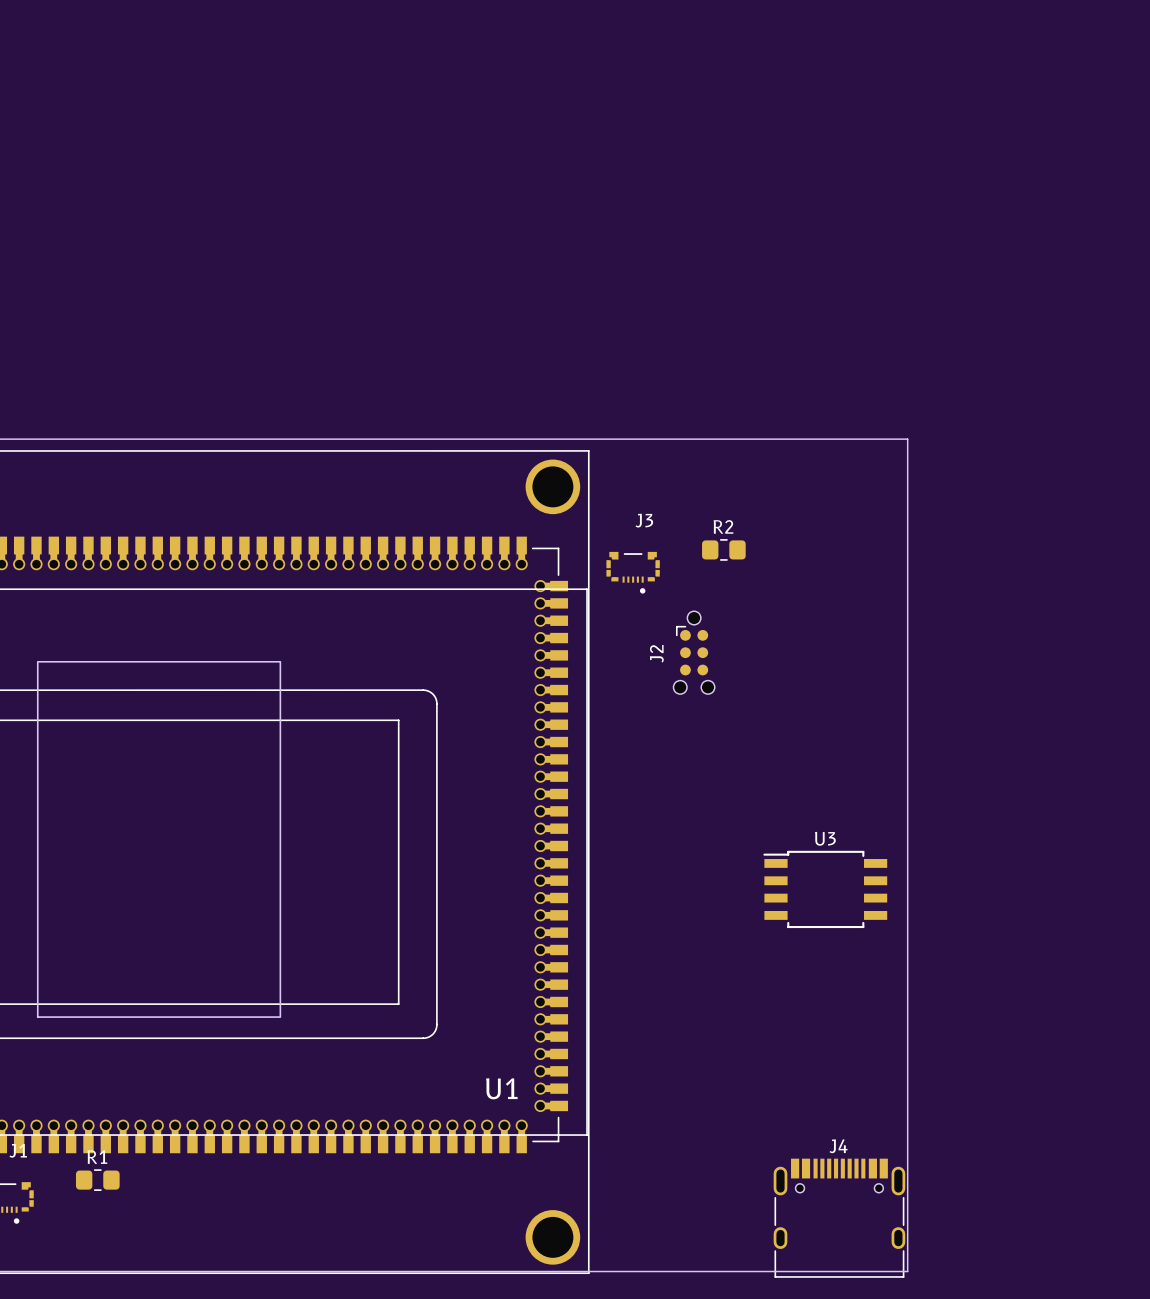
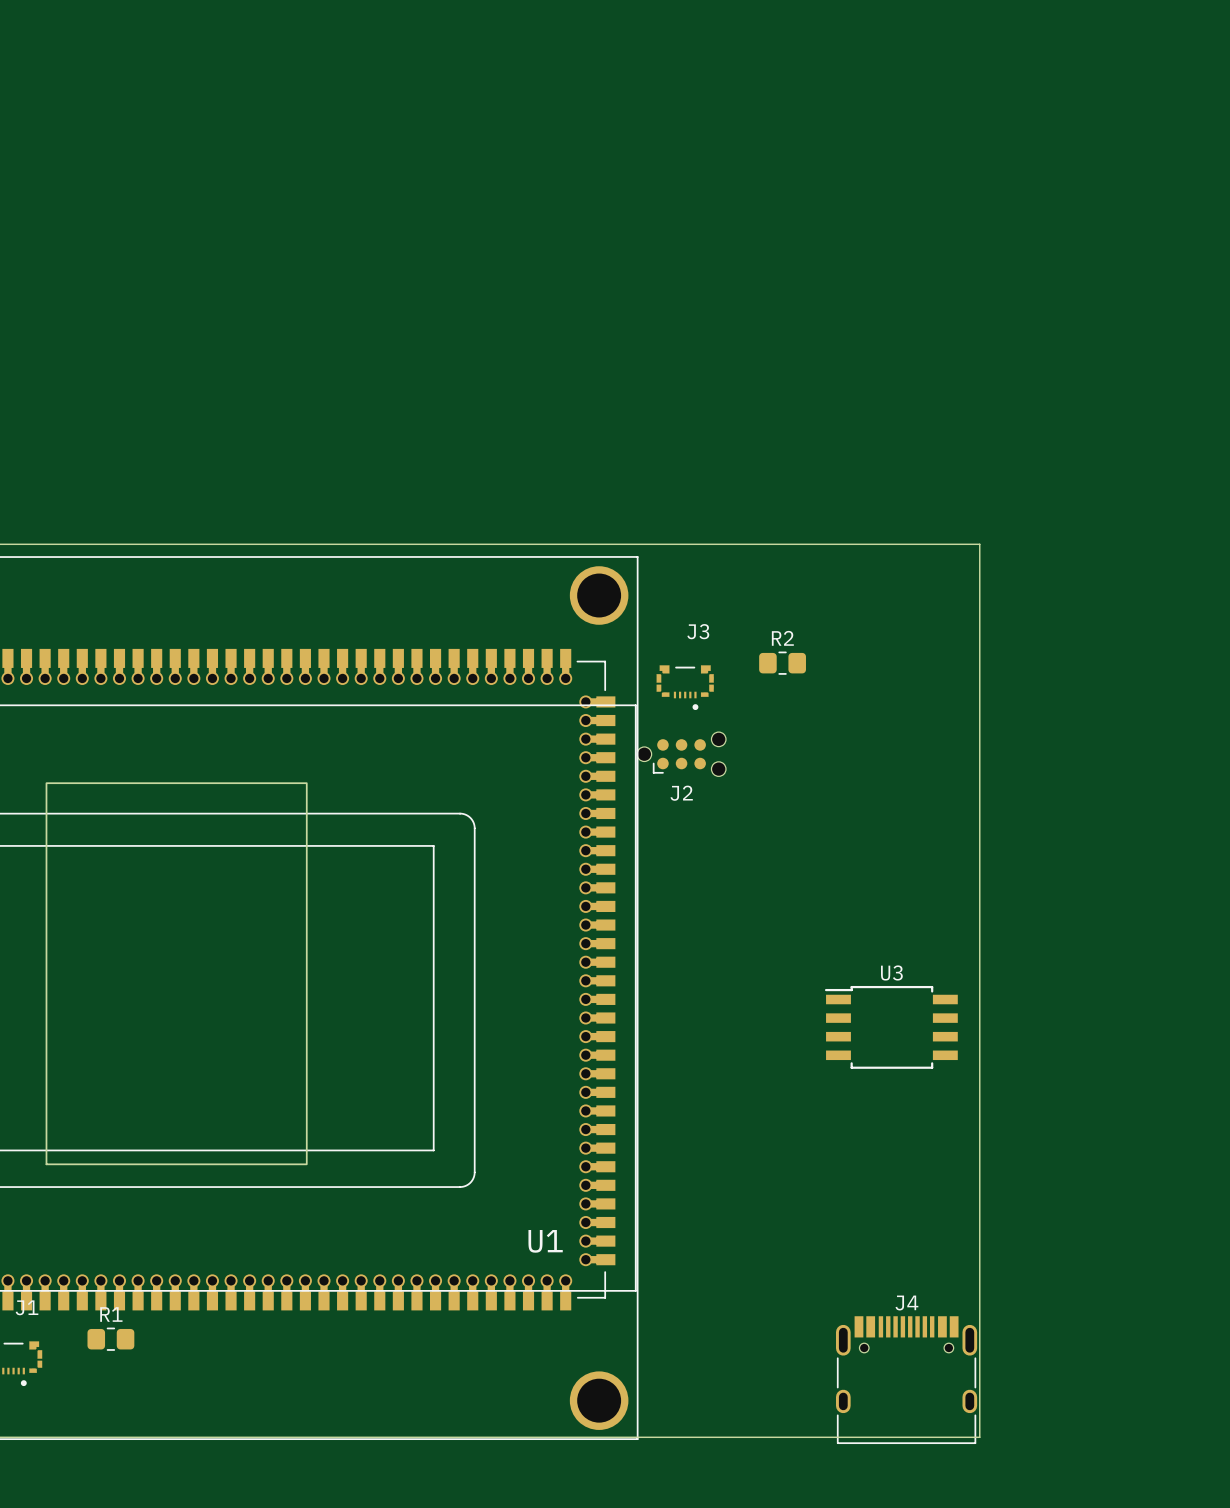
J2 rotation: 0° (694, 652) -> 90° counterclockwise (681, 754)
J2 position: (694, 652) -> (681, 754)

